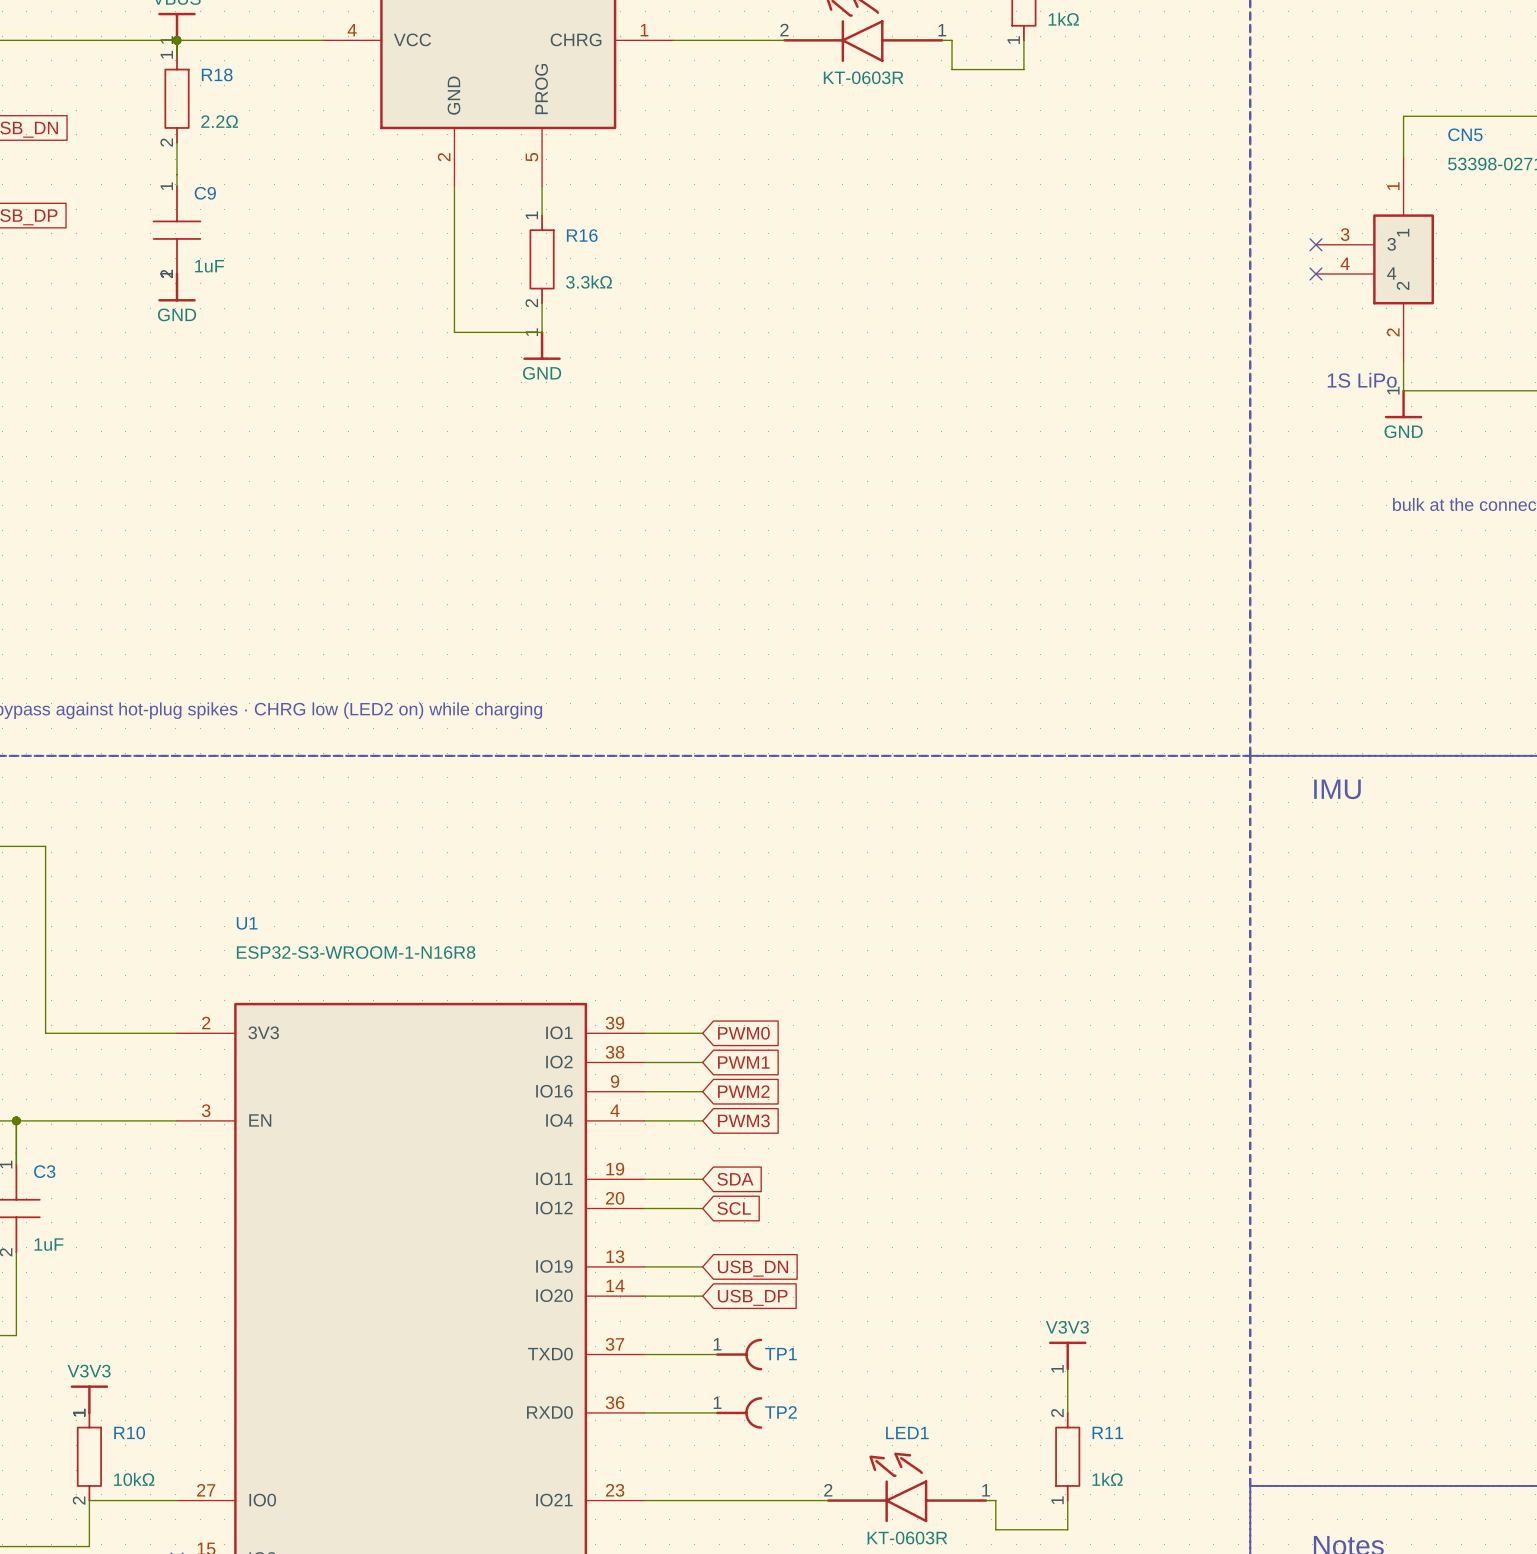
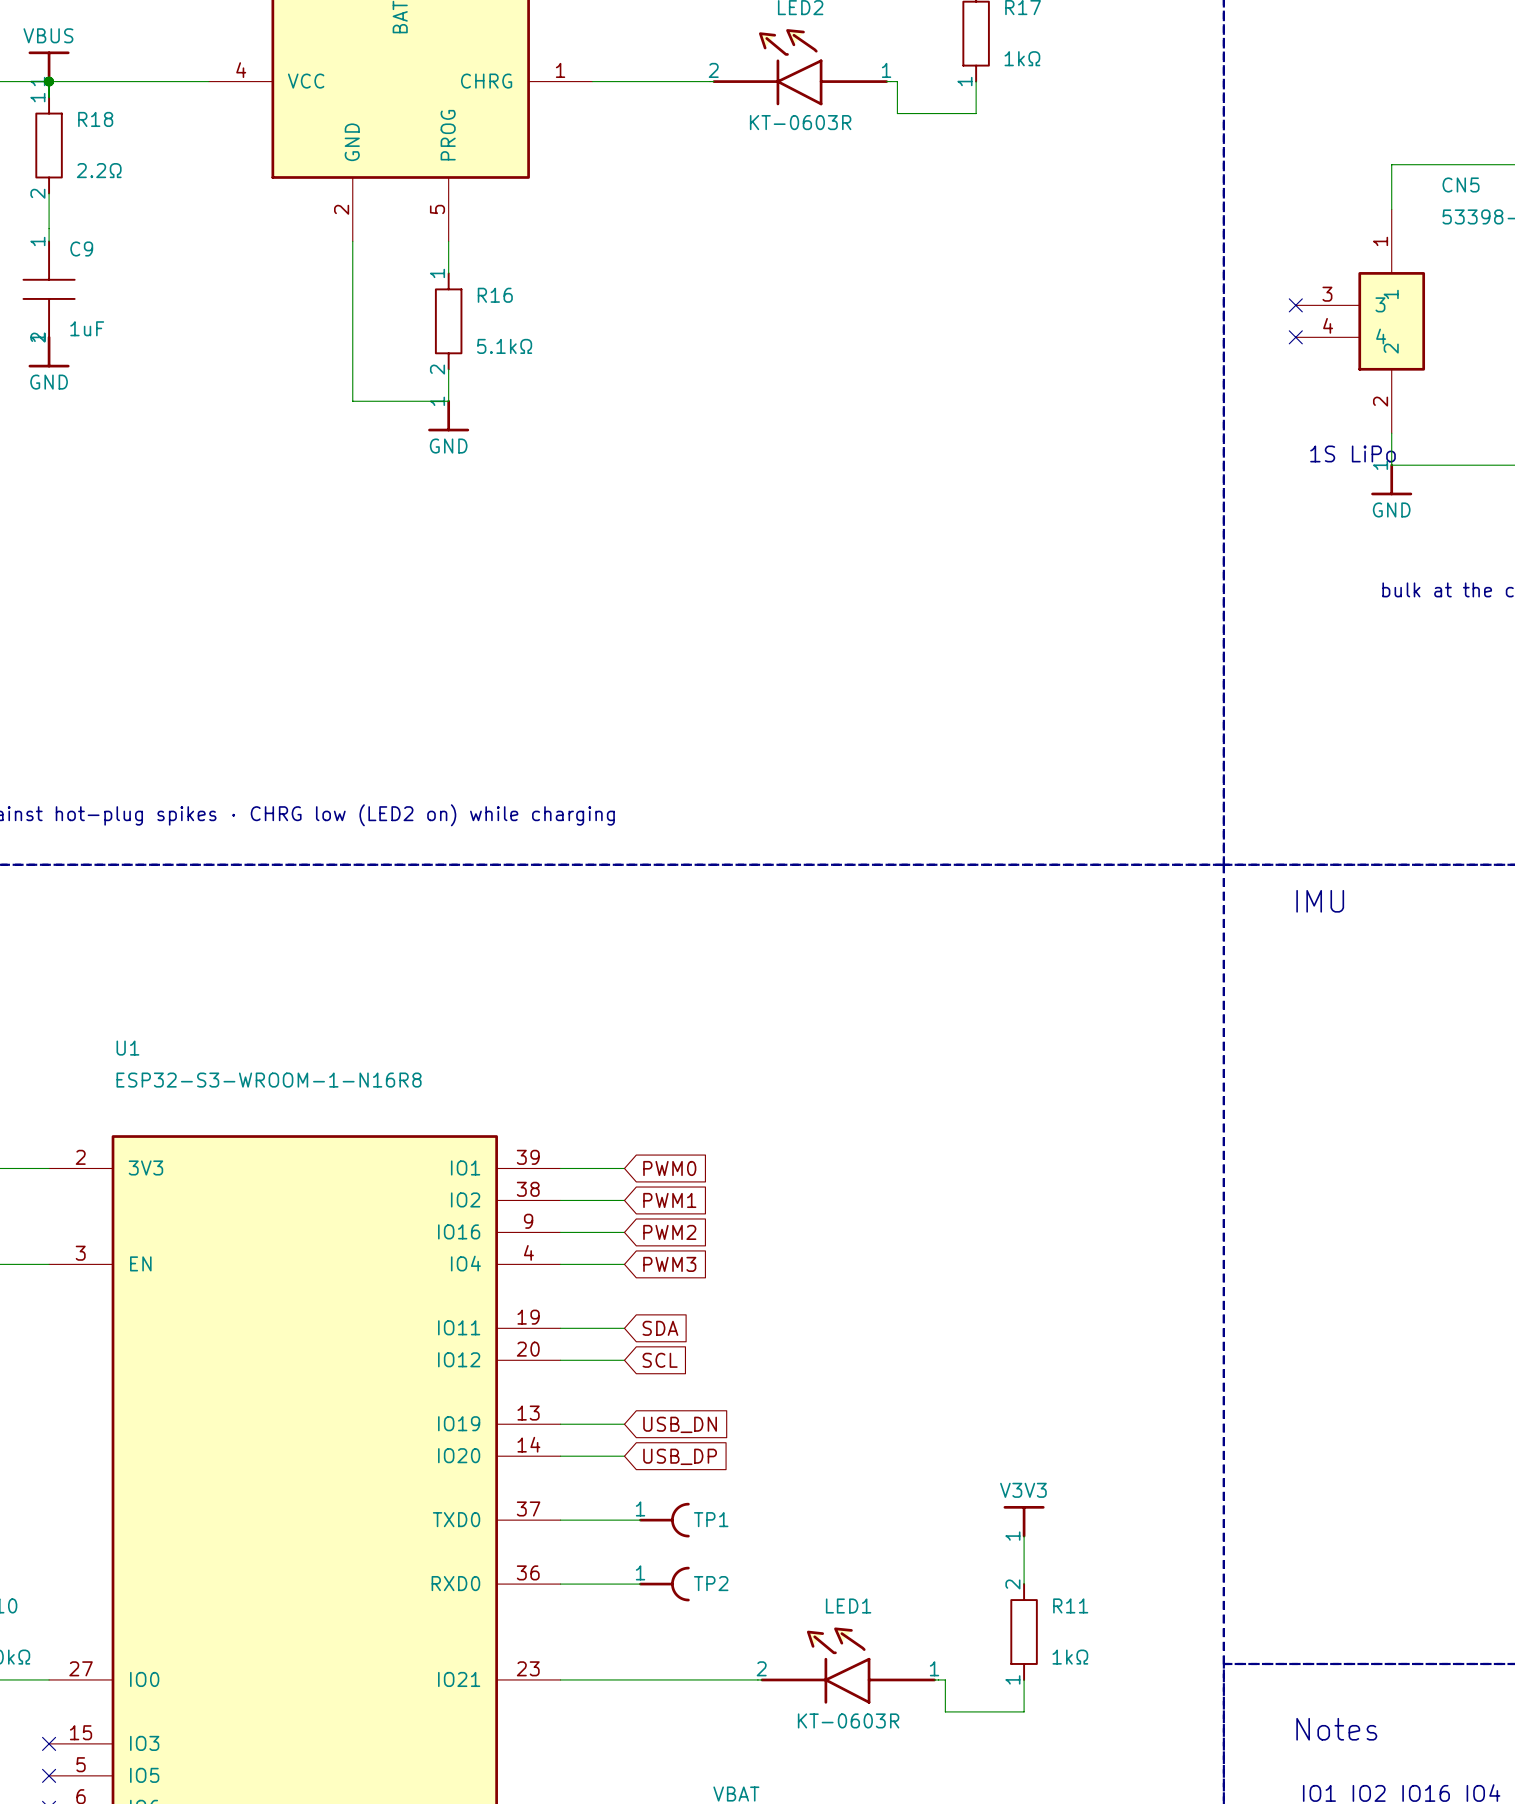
R16 value: 3.3kΩ (589, 282) -> 5.1kΩ (504, 346)

